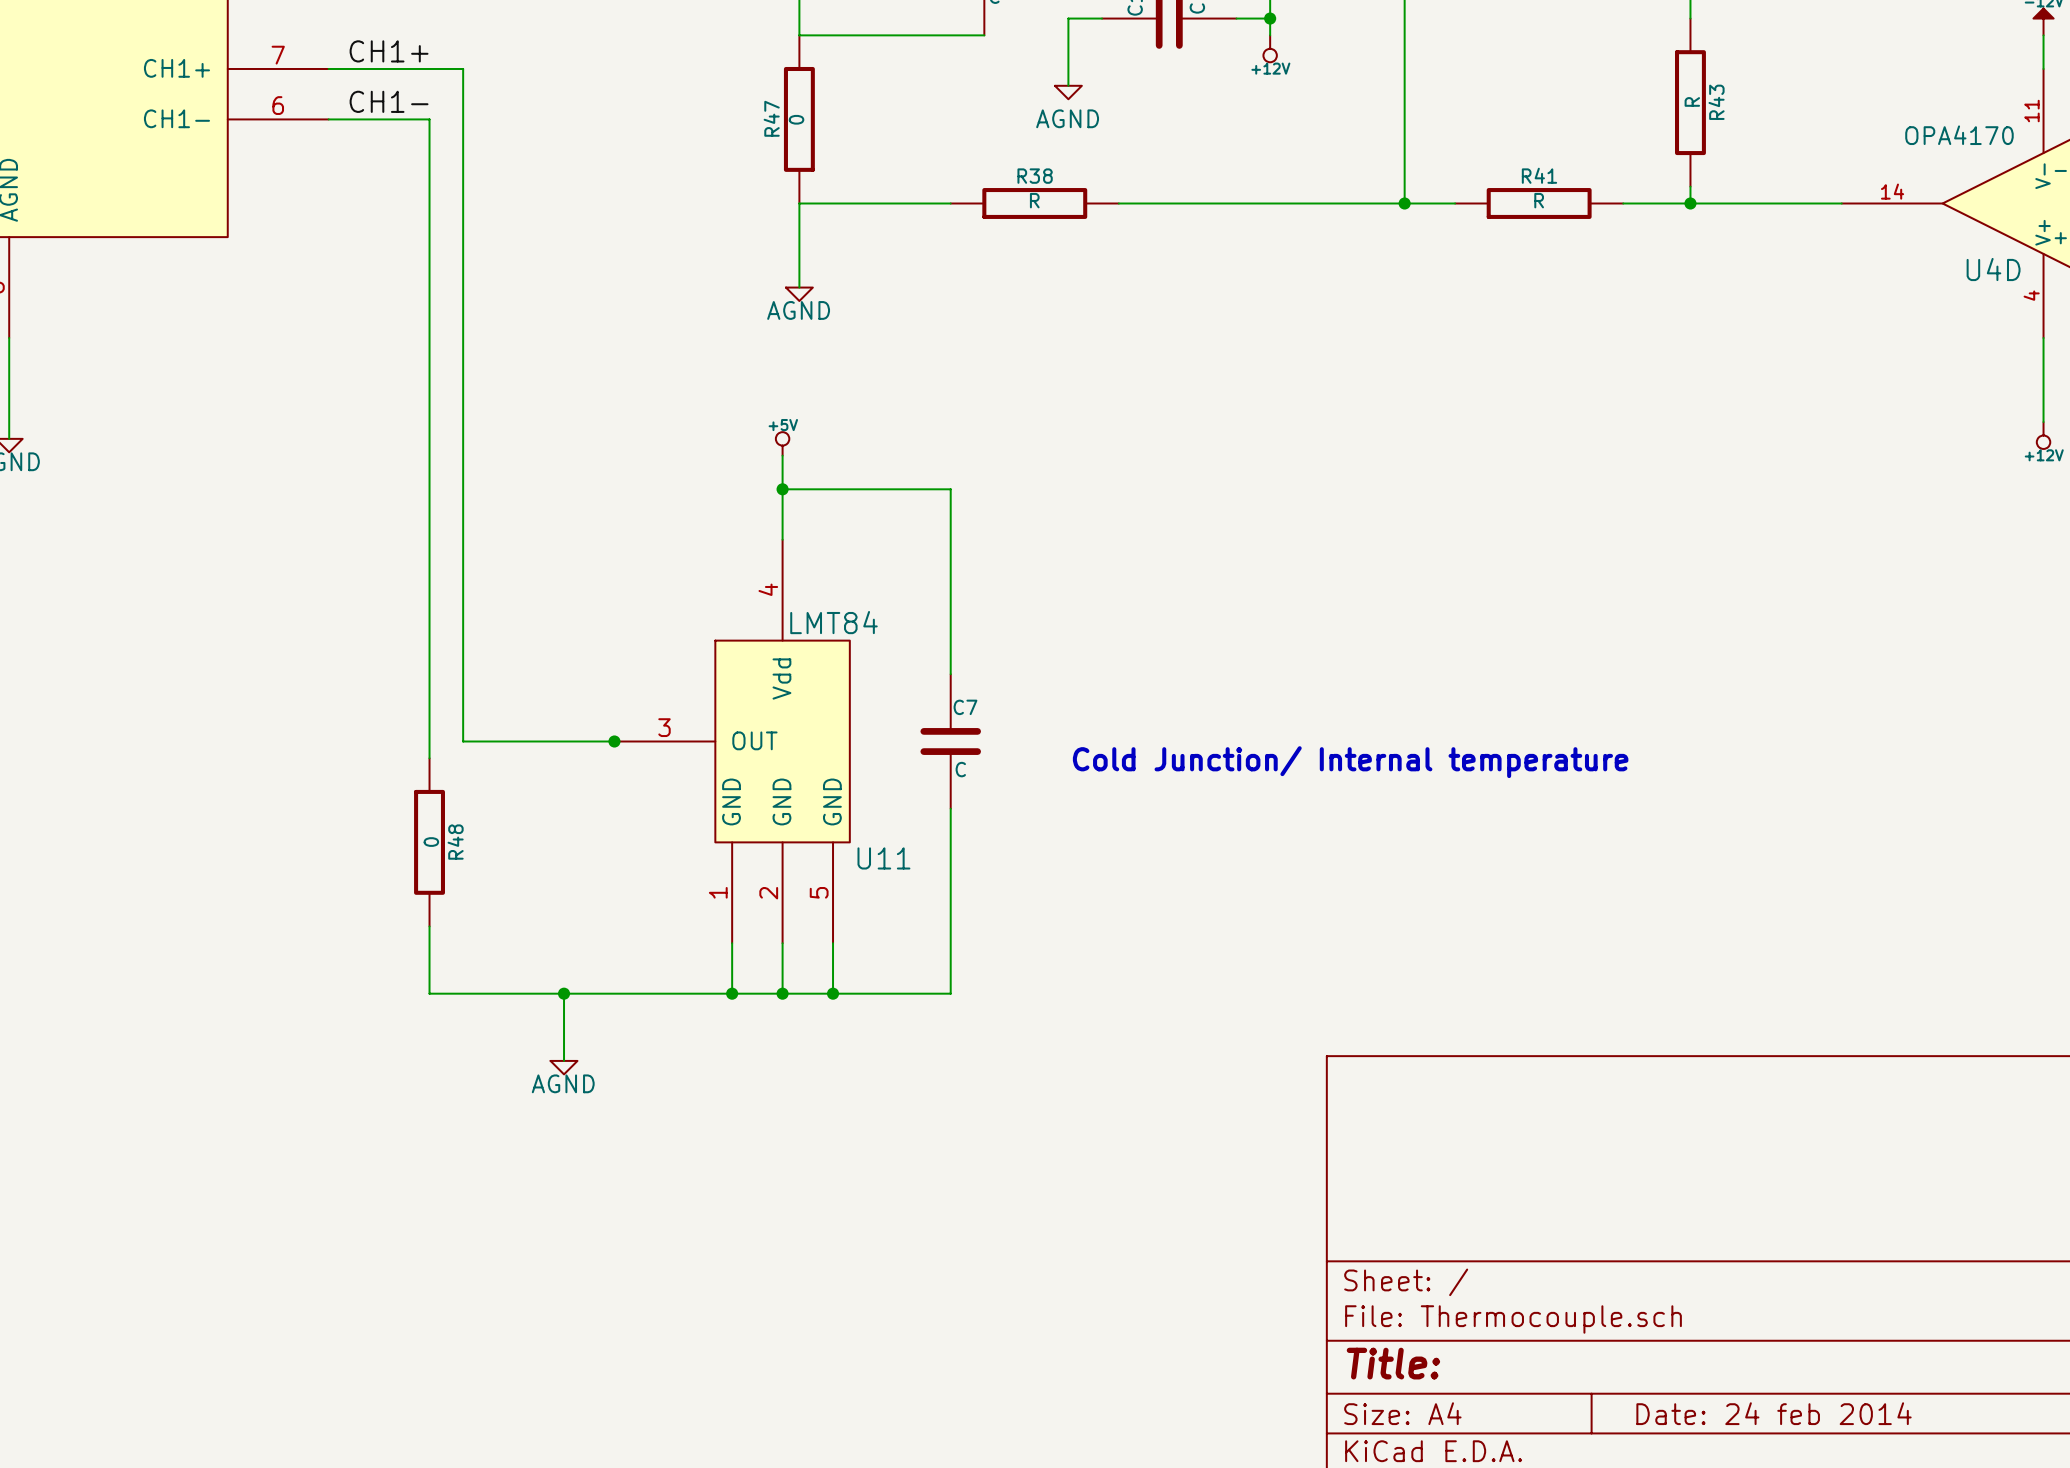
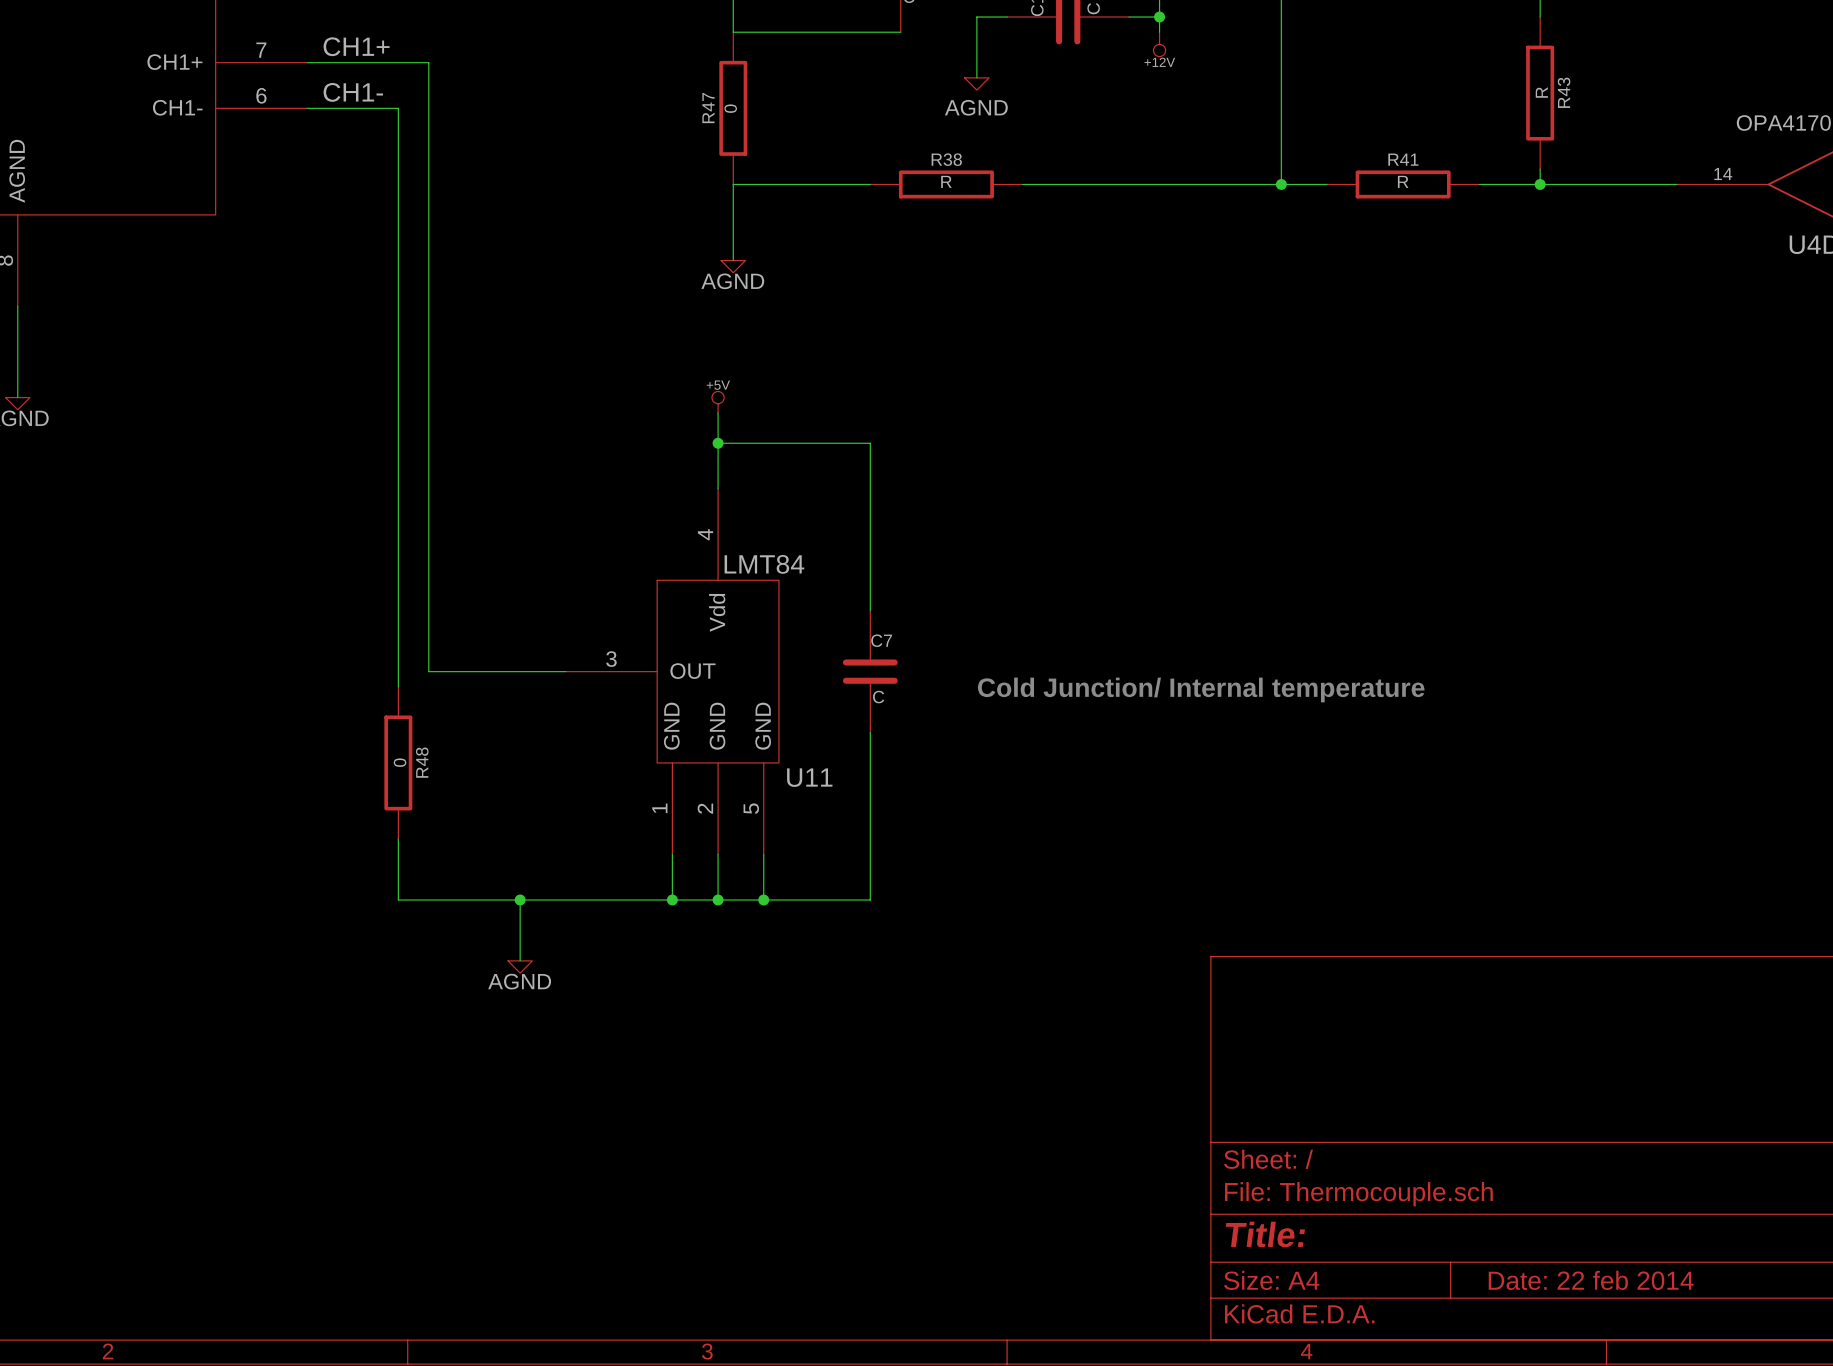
junction: (614, 741) -> none
title block: Date: 24 feb 2014 (1774, 1413) -> Date: 22 feb 2014 (1591, 1280)

